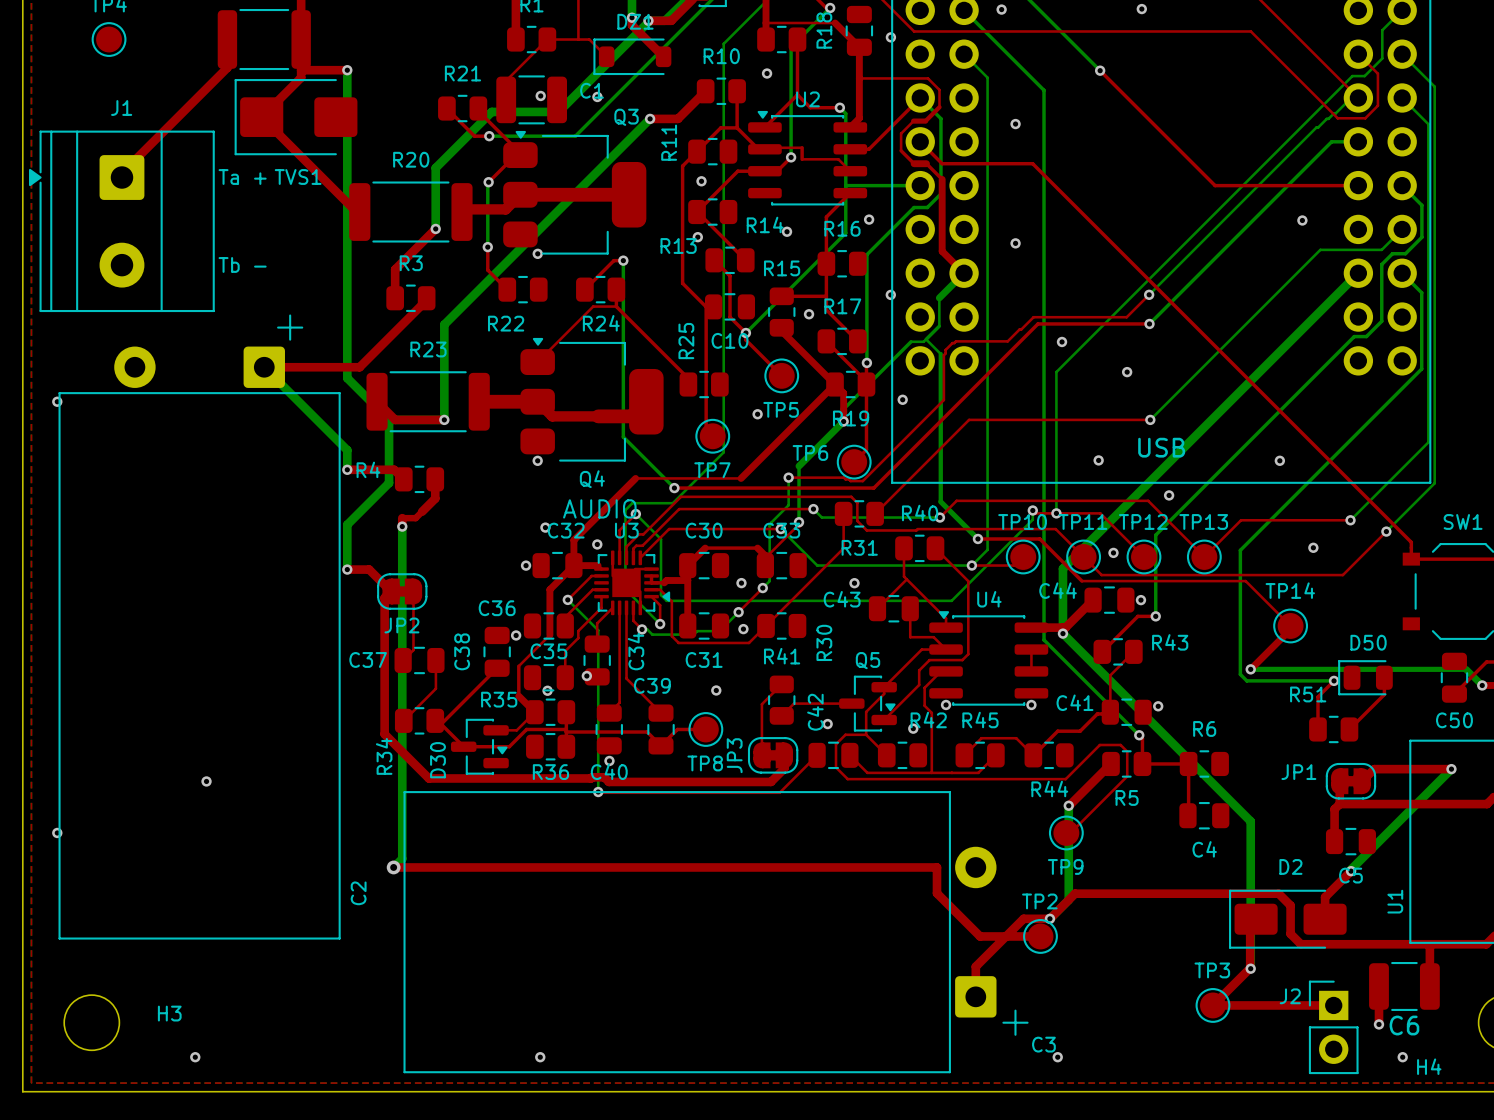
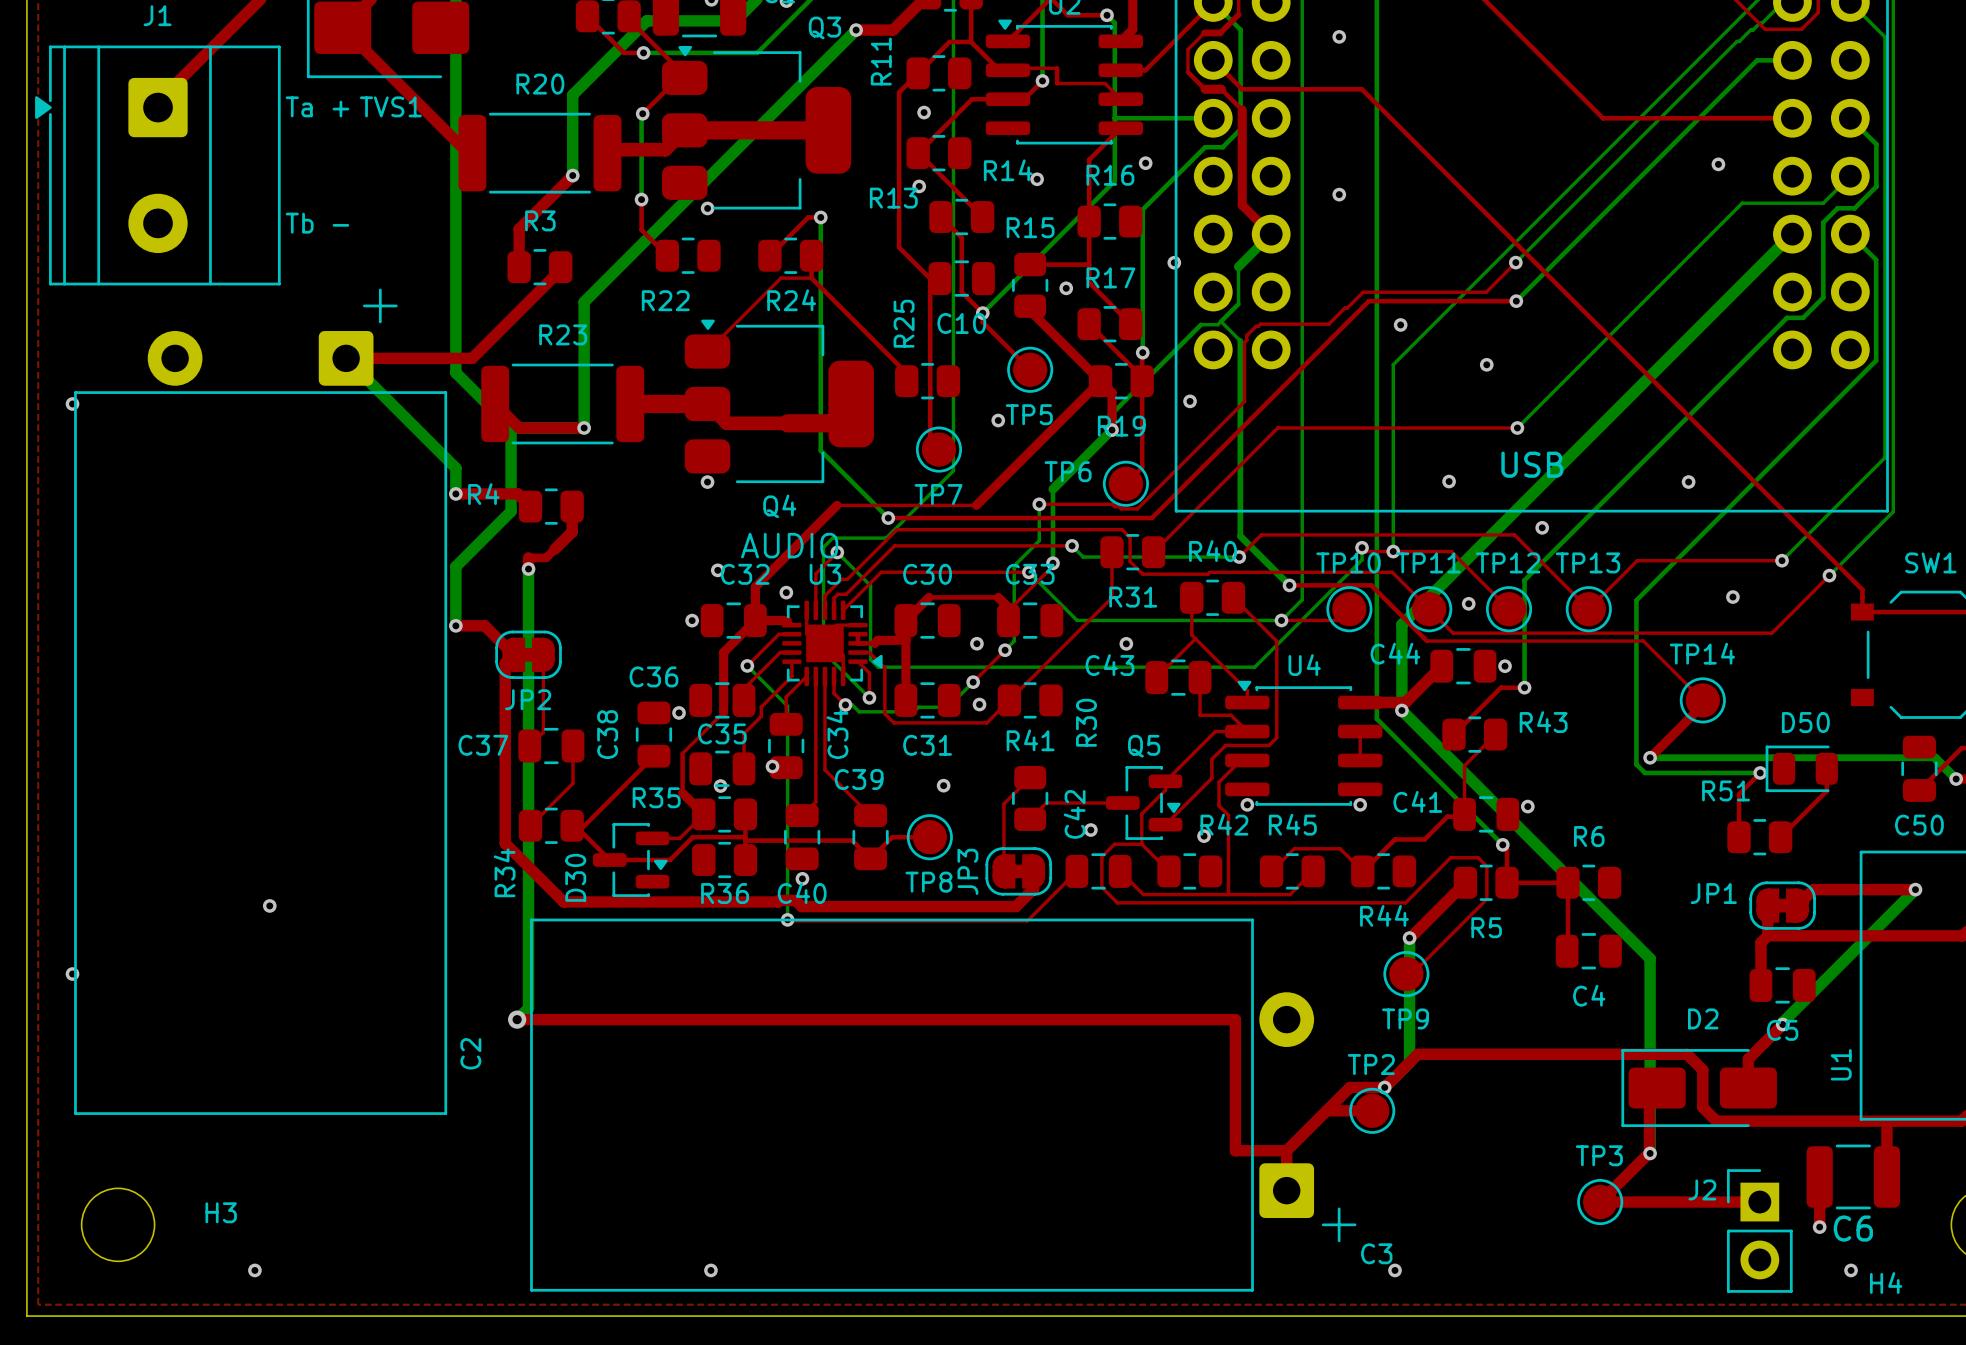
top track: (936, 893) (980, 936) (1005, 936) -> (1235, 1053) (1235, 1150) (1286, 1150)

